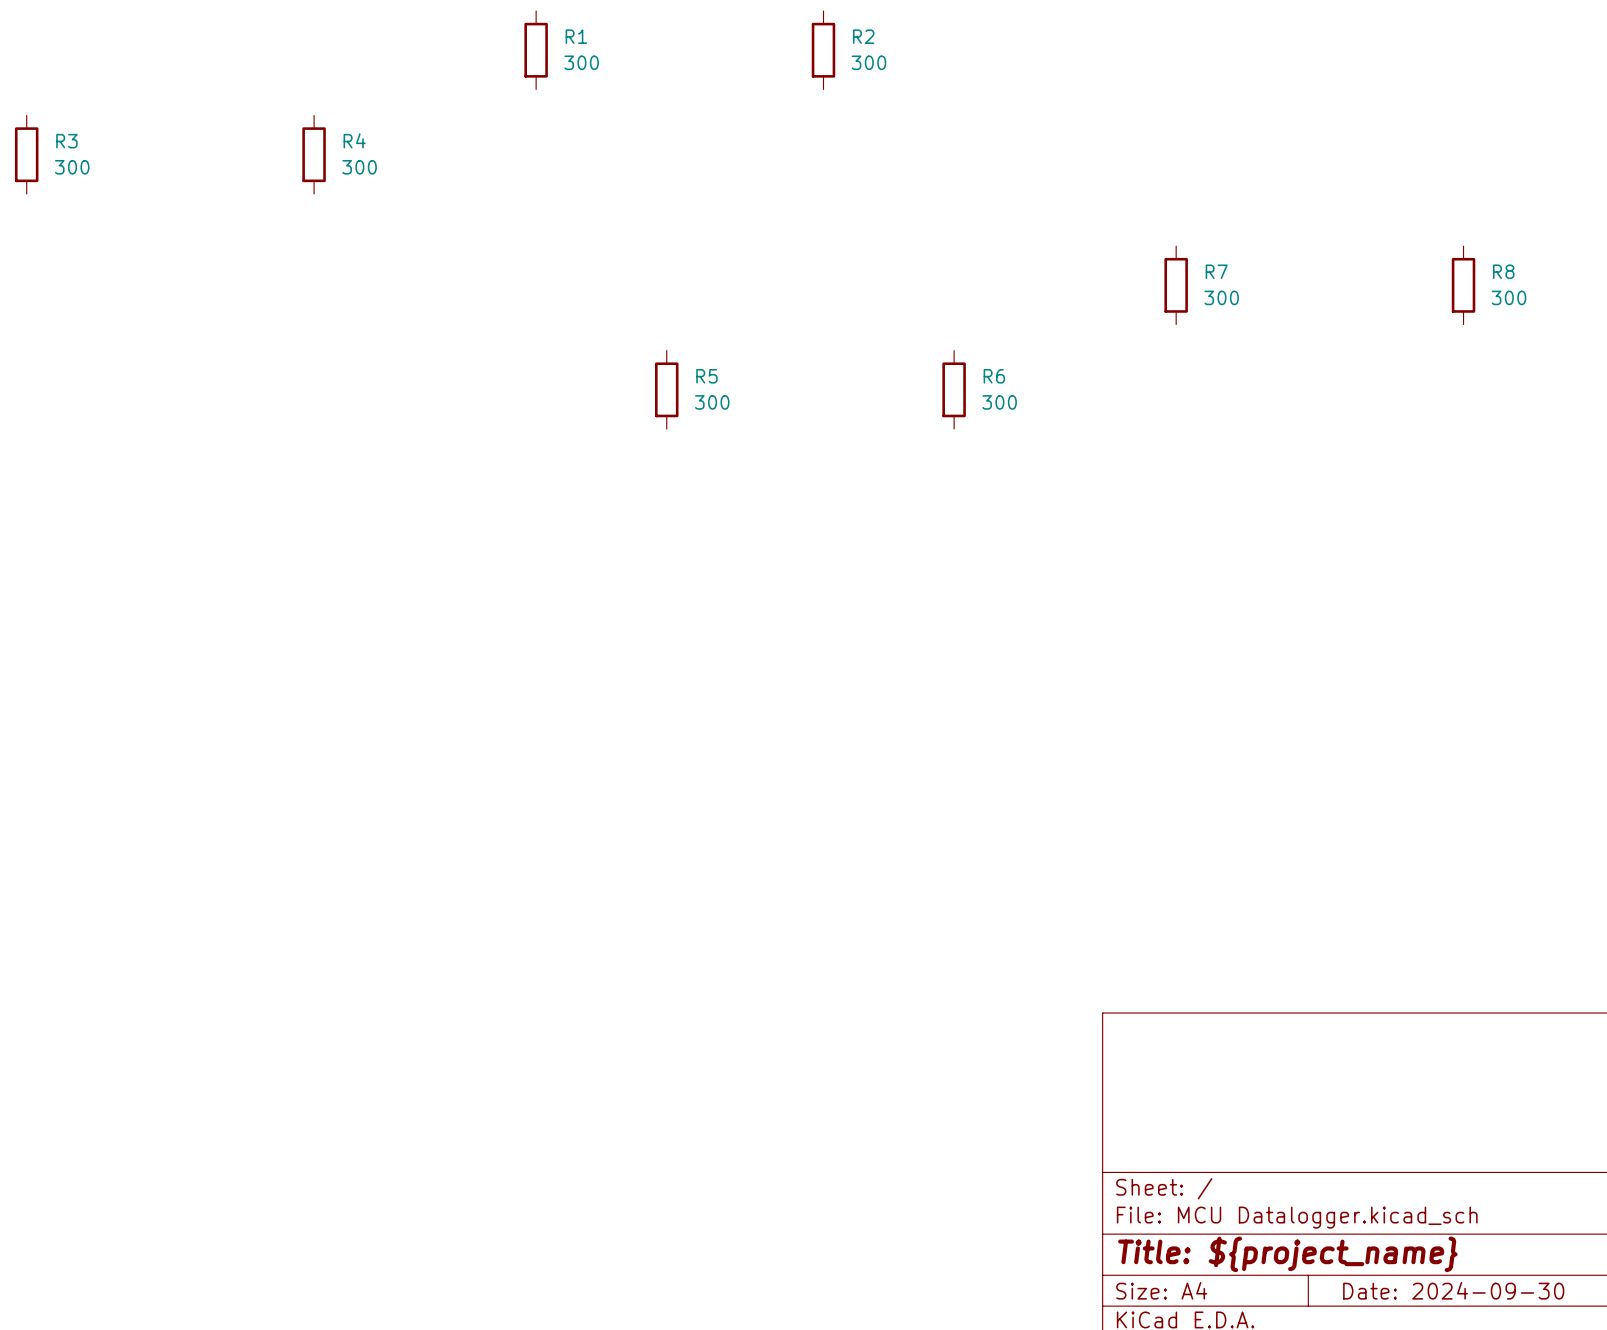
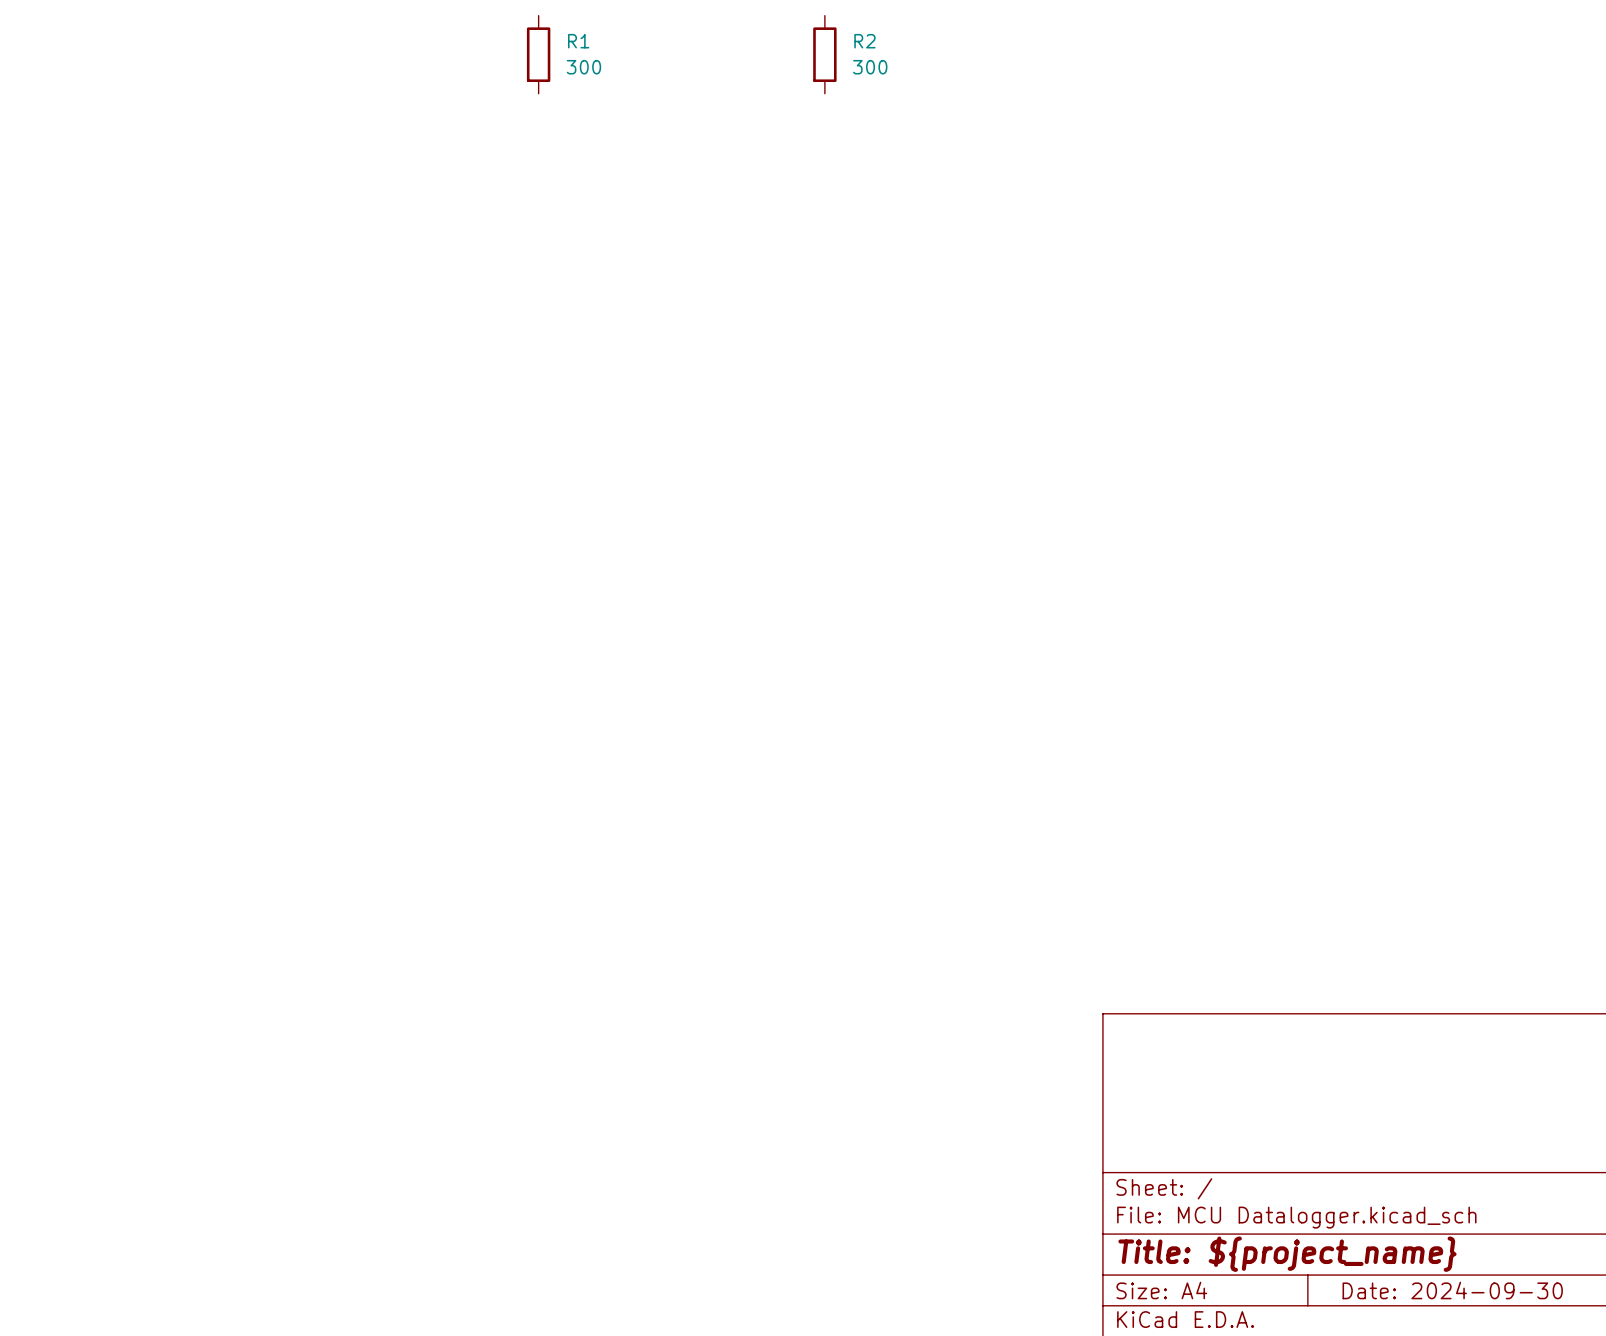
R3: 300 (26, 154) -> none
R4: 300 (314, 154) -> none
R7: 300 (1176, 285) -> none
R8: 300 (1463, 285) -> none
R5: 300 (666, 389) -> none
R6: 300 (954, 389) -> none

